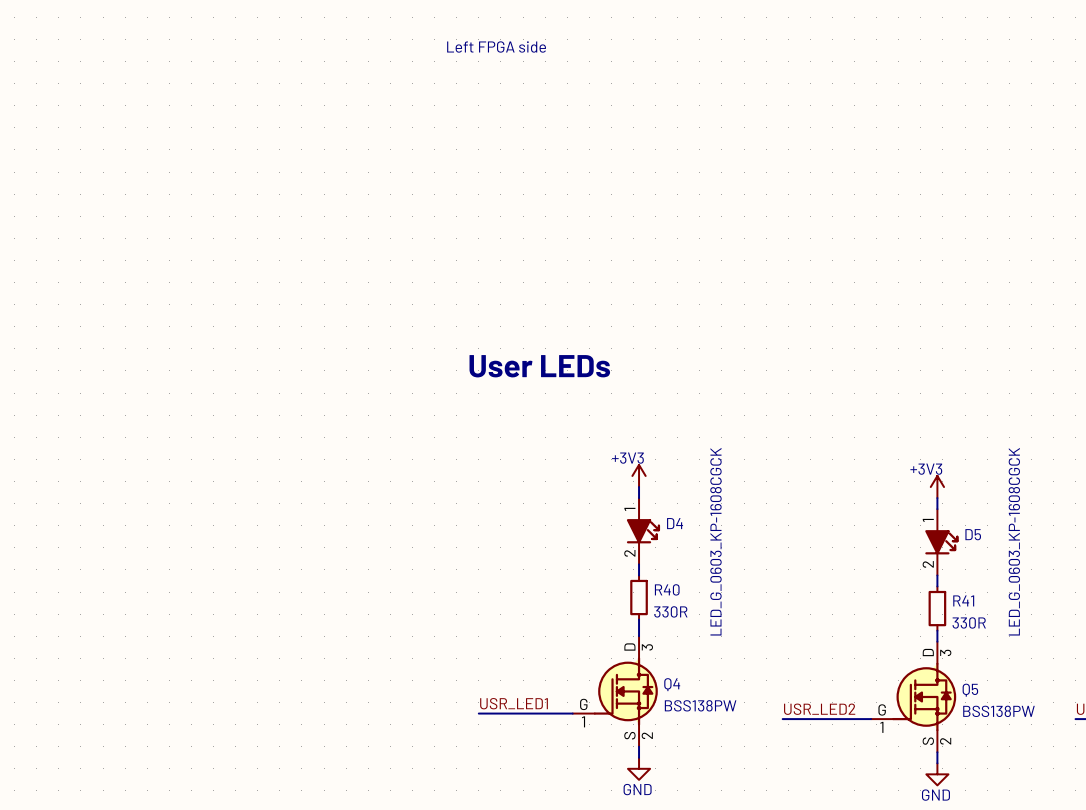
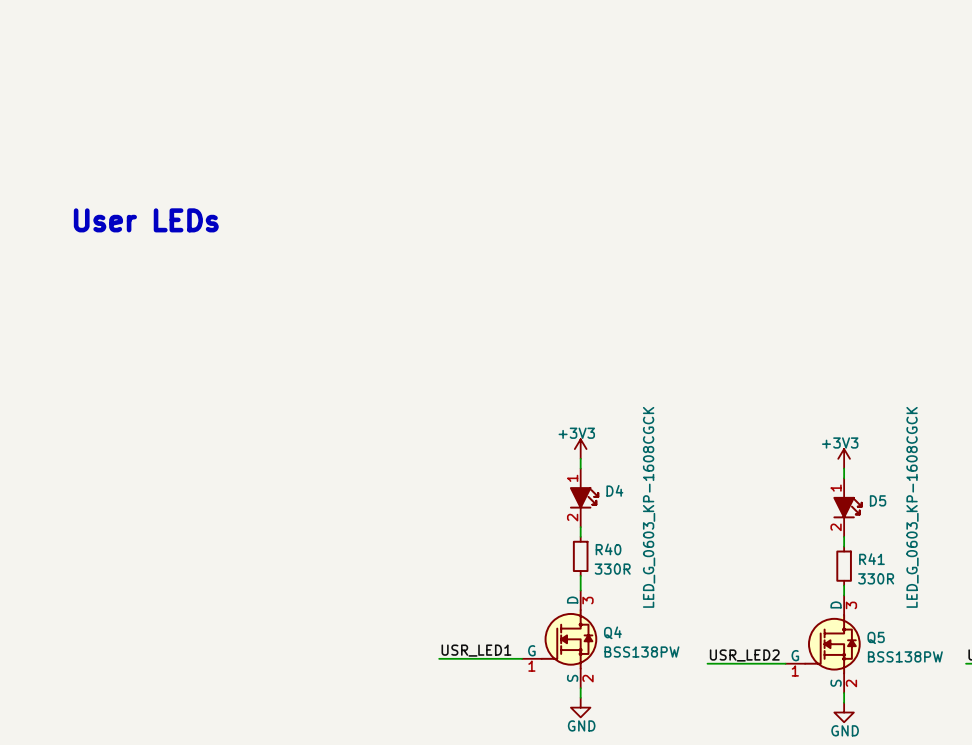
text: Left FPGA side (496, 46) -> none
text: none -> User LEDs (146, 220)
text: User LEDs (539, 366) -> none

